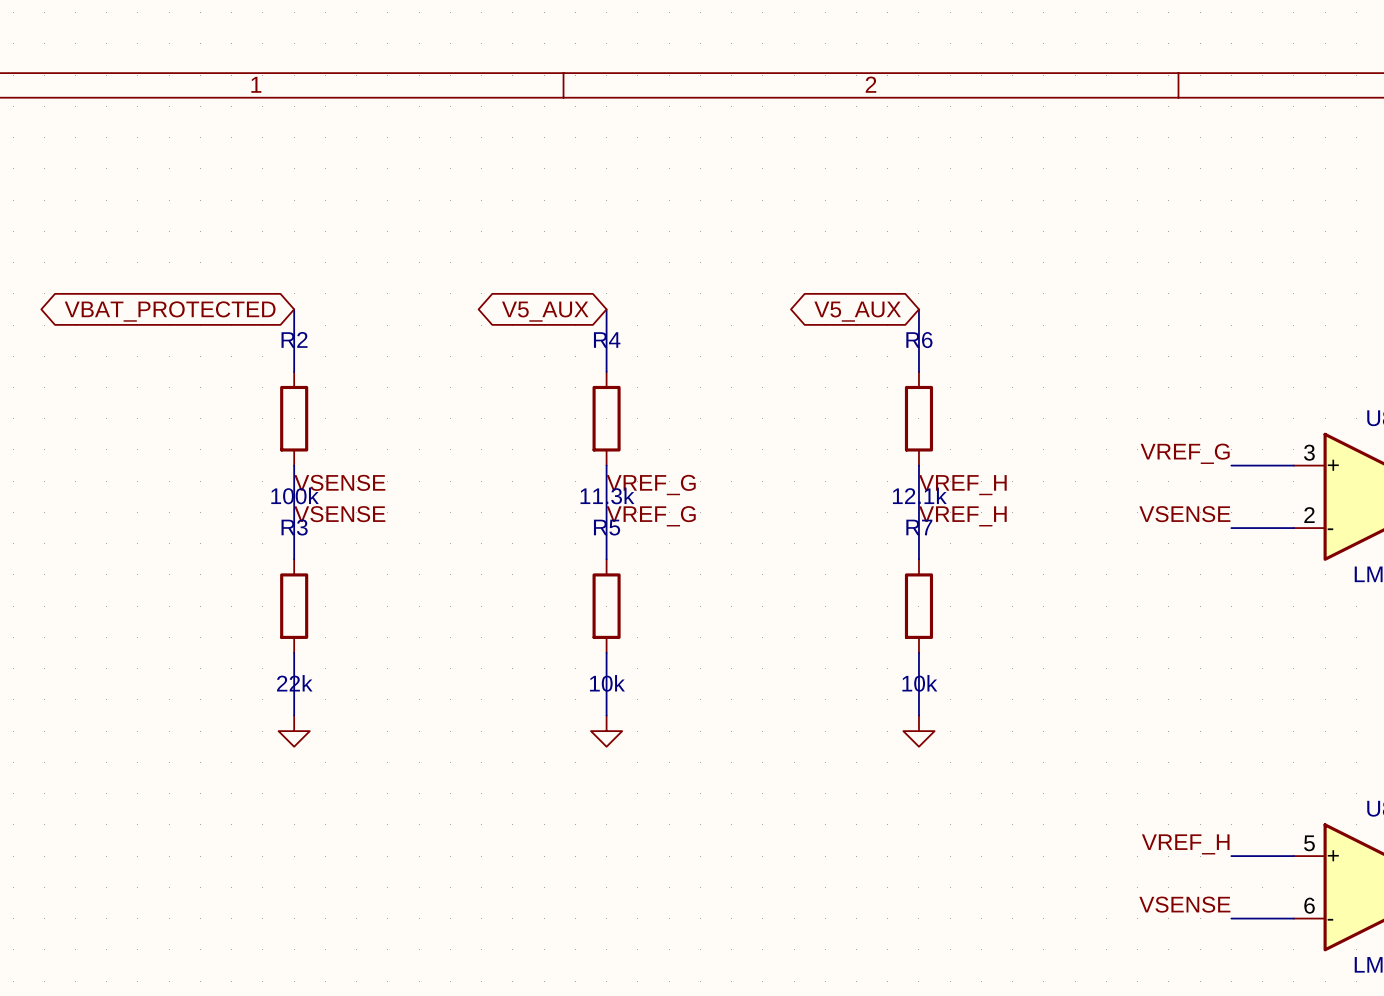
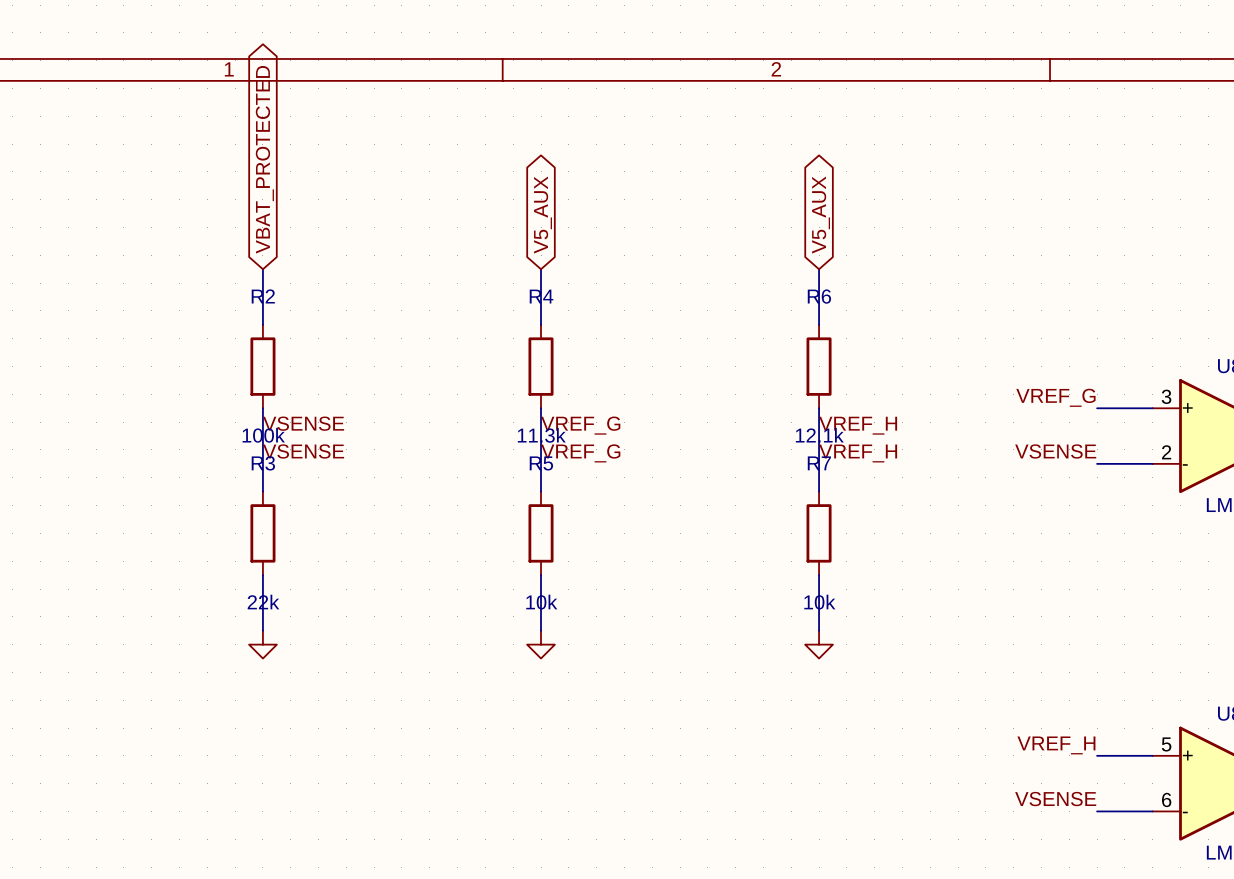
global label rotation: 0° (170, 311) -> 90° clockwise (264, 159)
global label rotation: 0° (545, 311) -> 90° clockwise (543, 215)
global label rotation: 0° (857, 311) -> 90° clockwise (821, 215)

